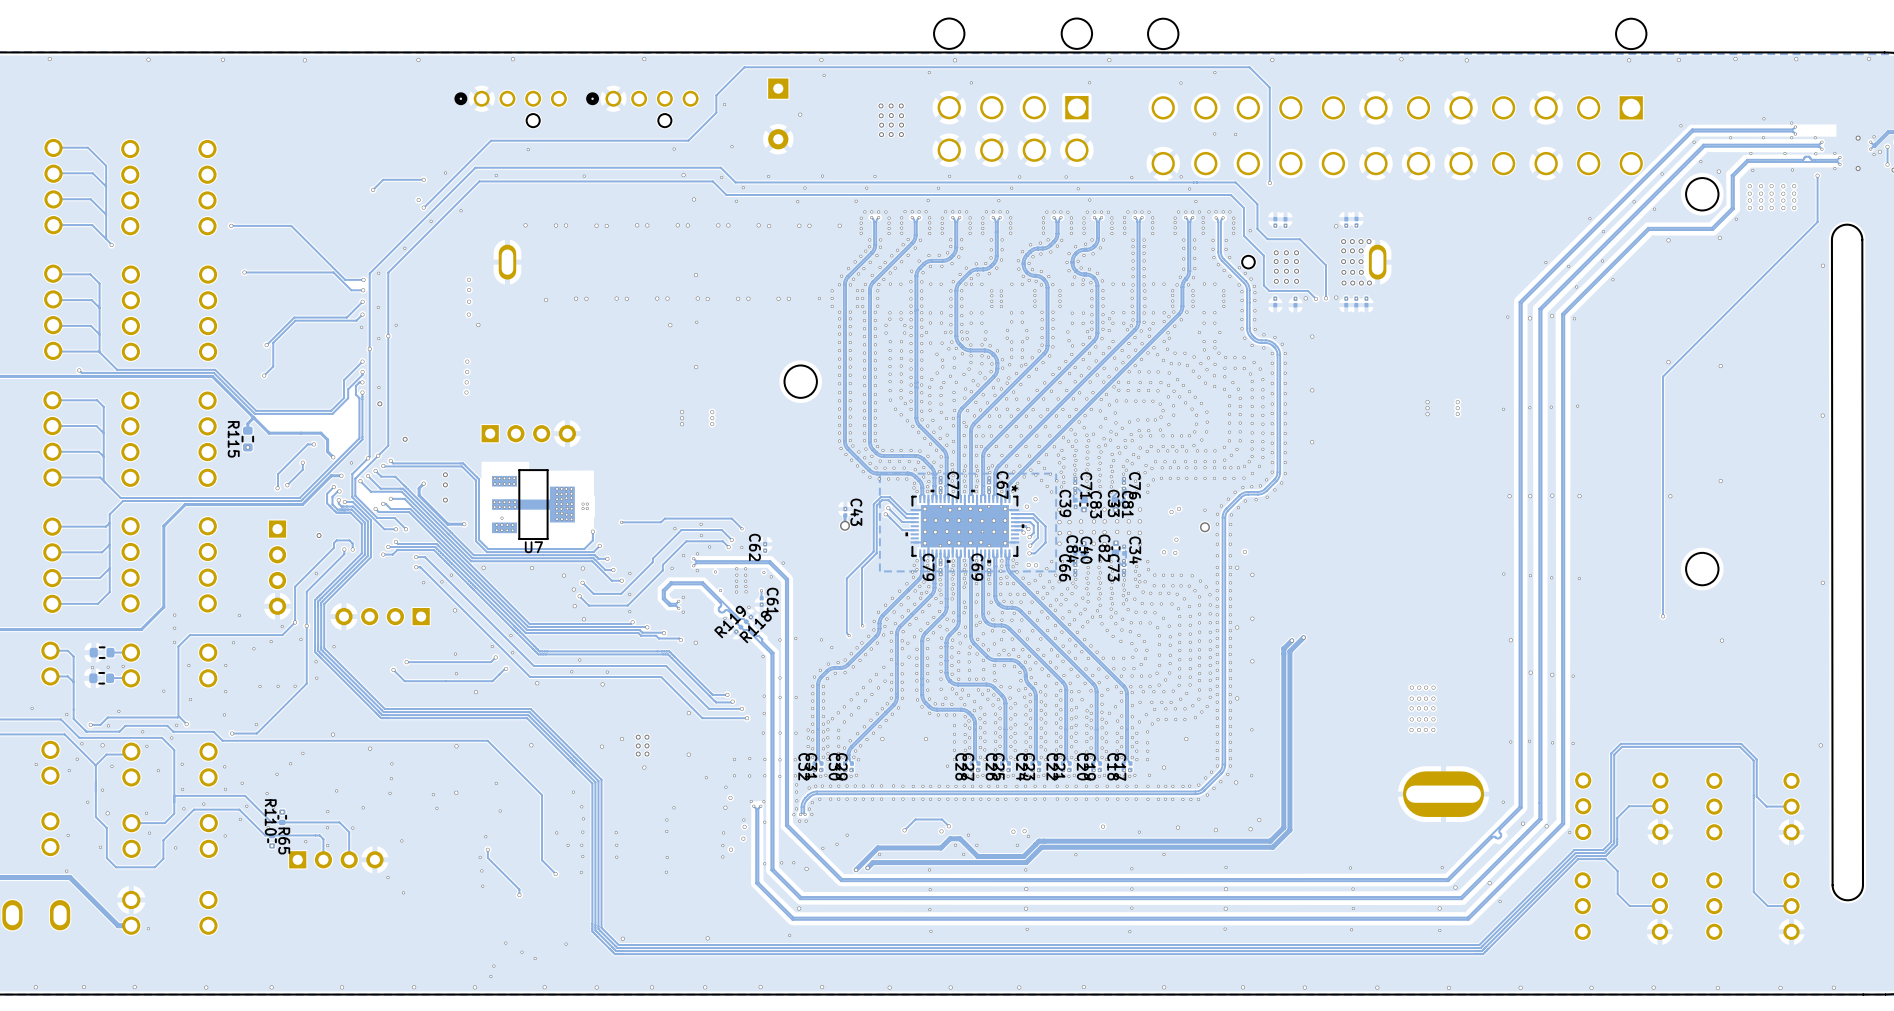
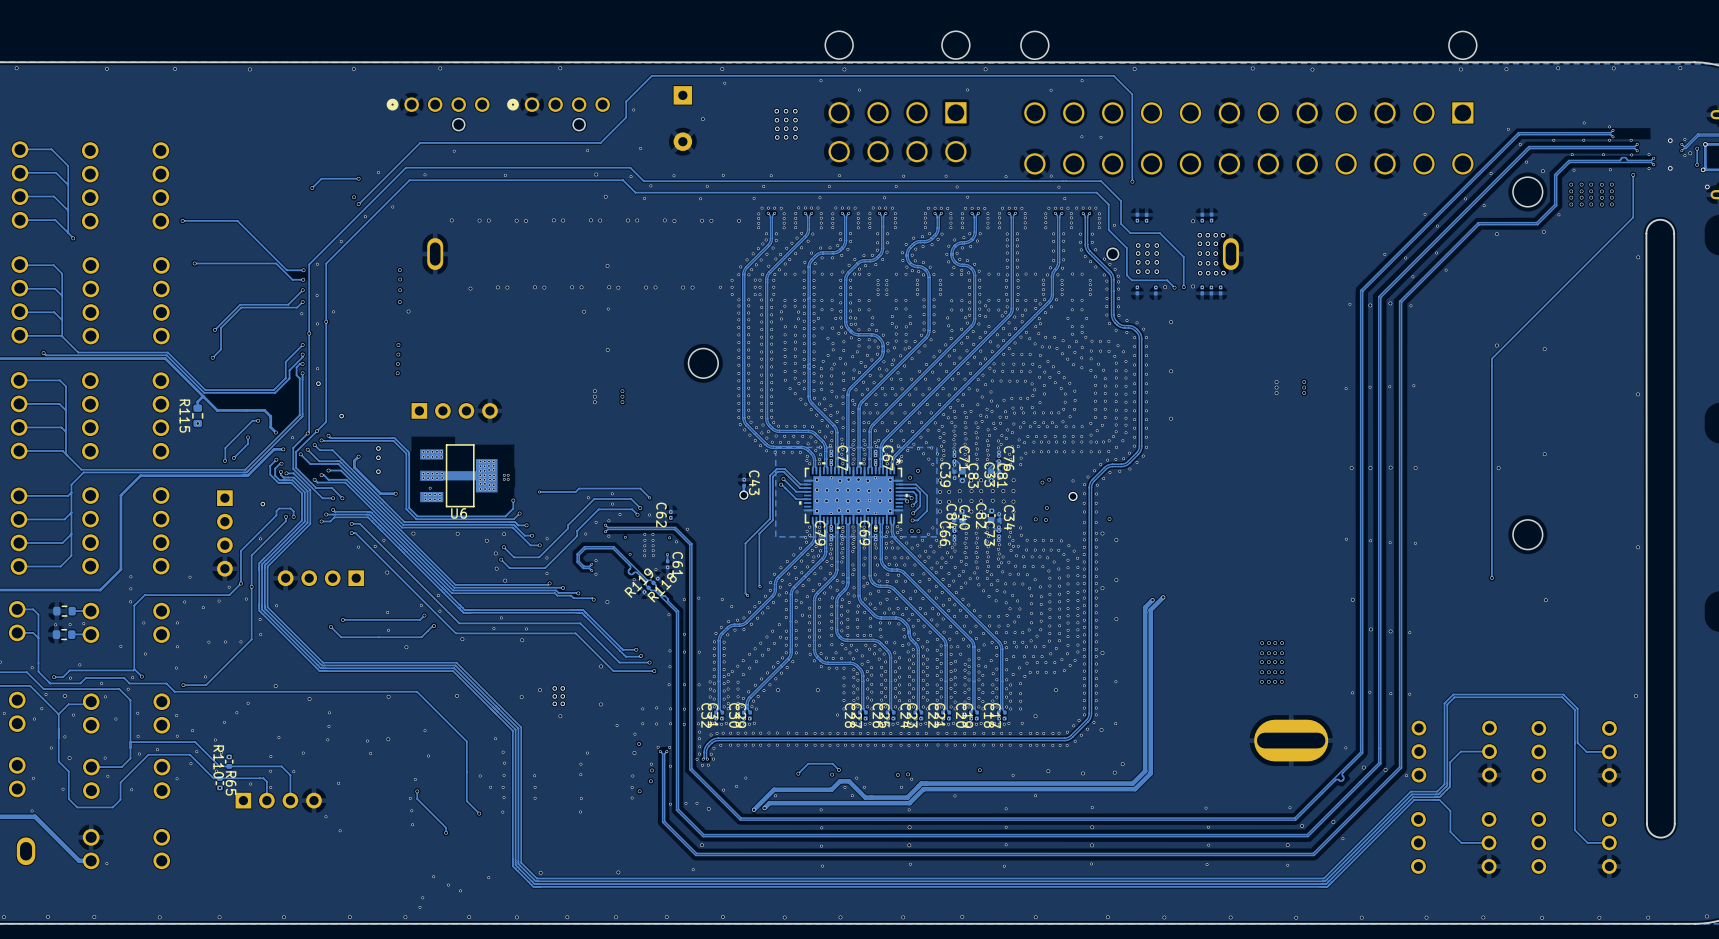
U7: (533, 504) -> none
U6: none -> (458, 475)

